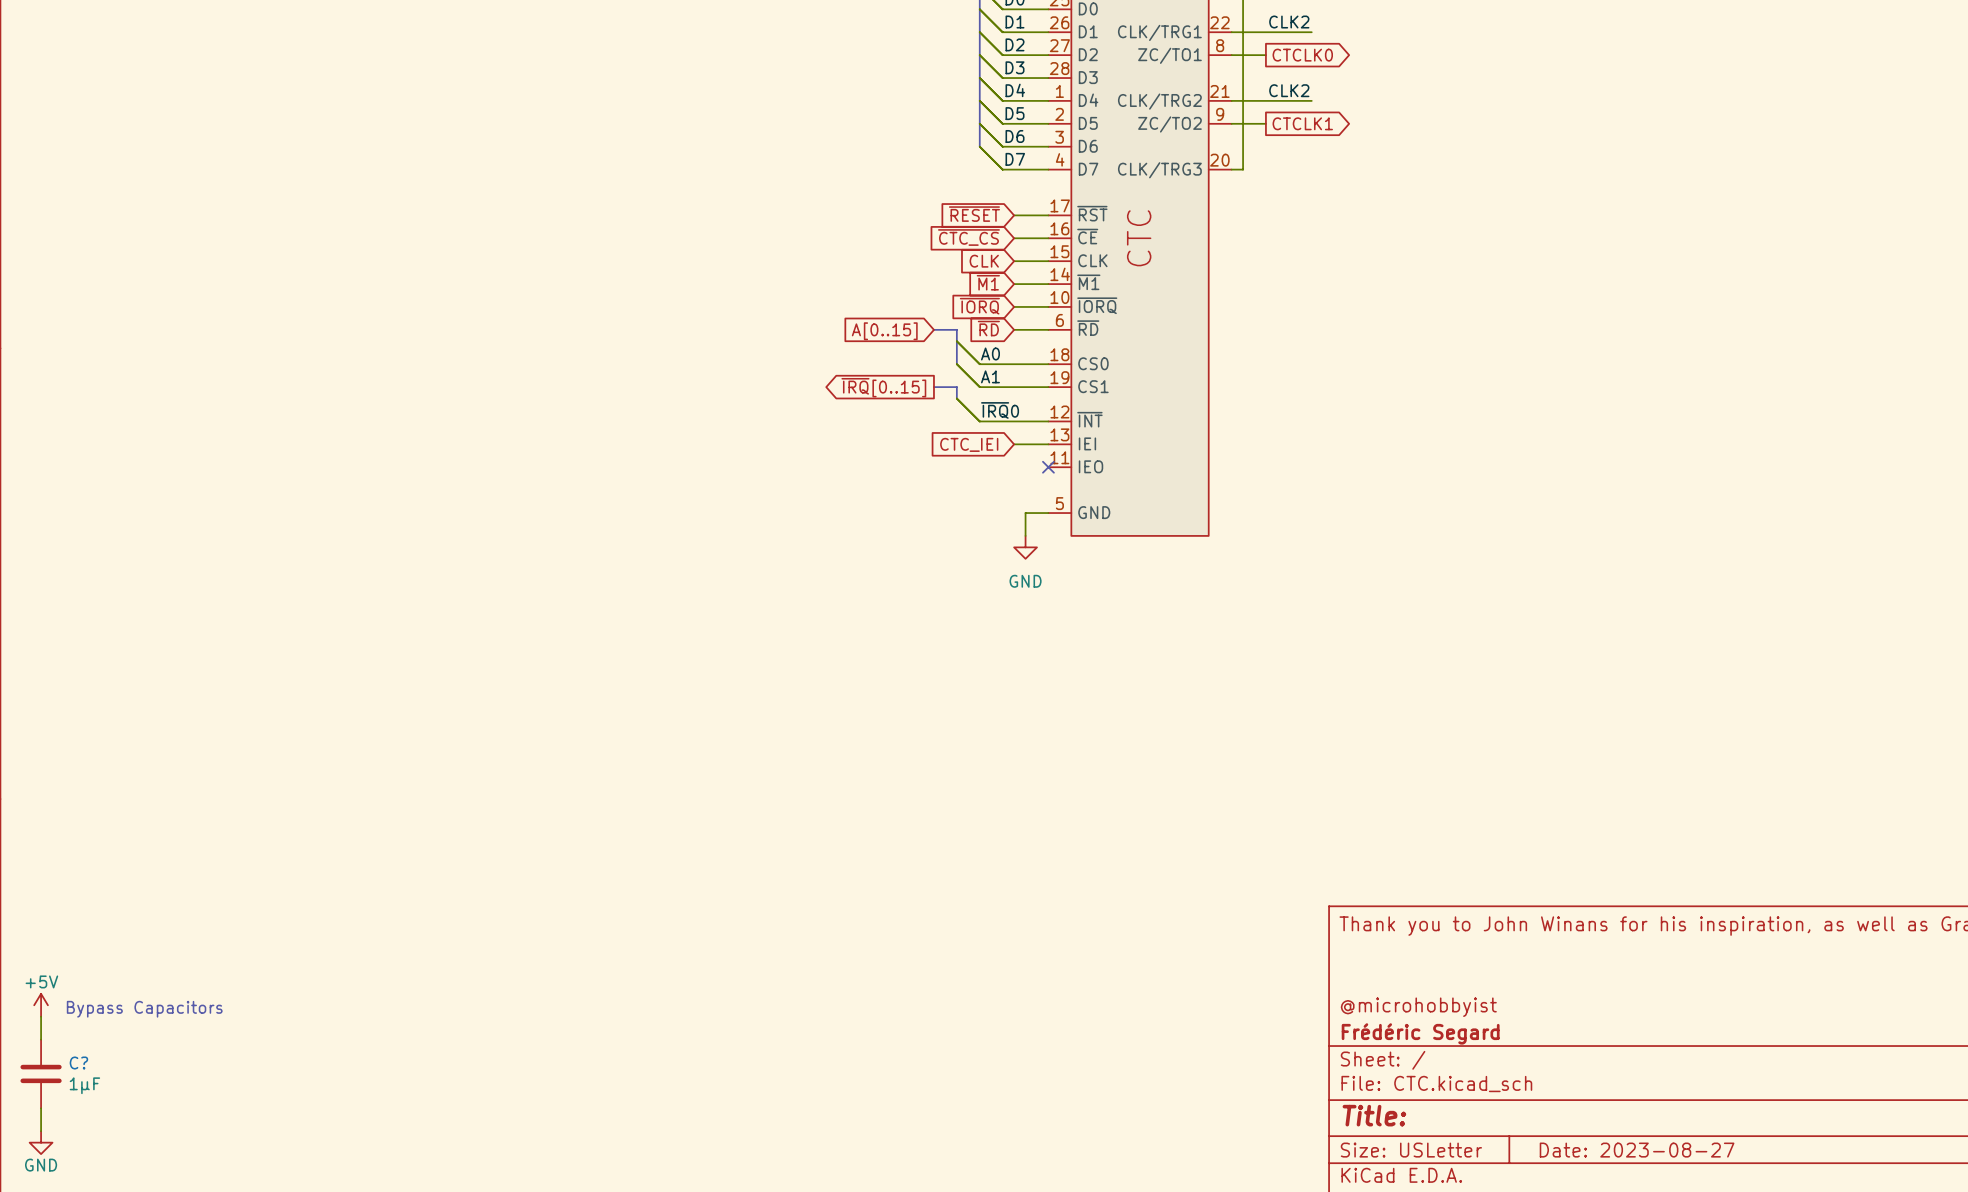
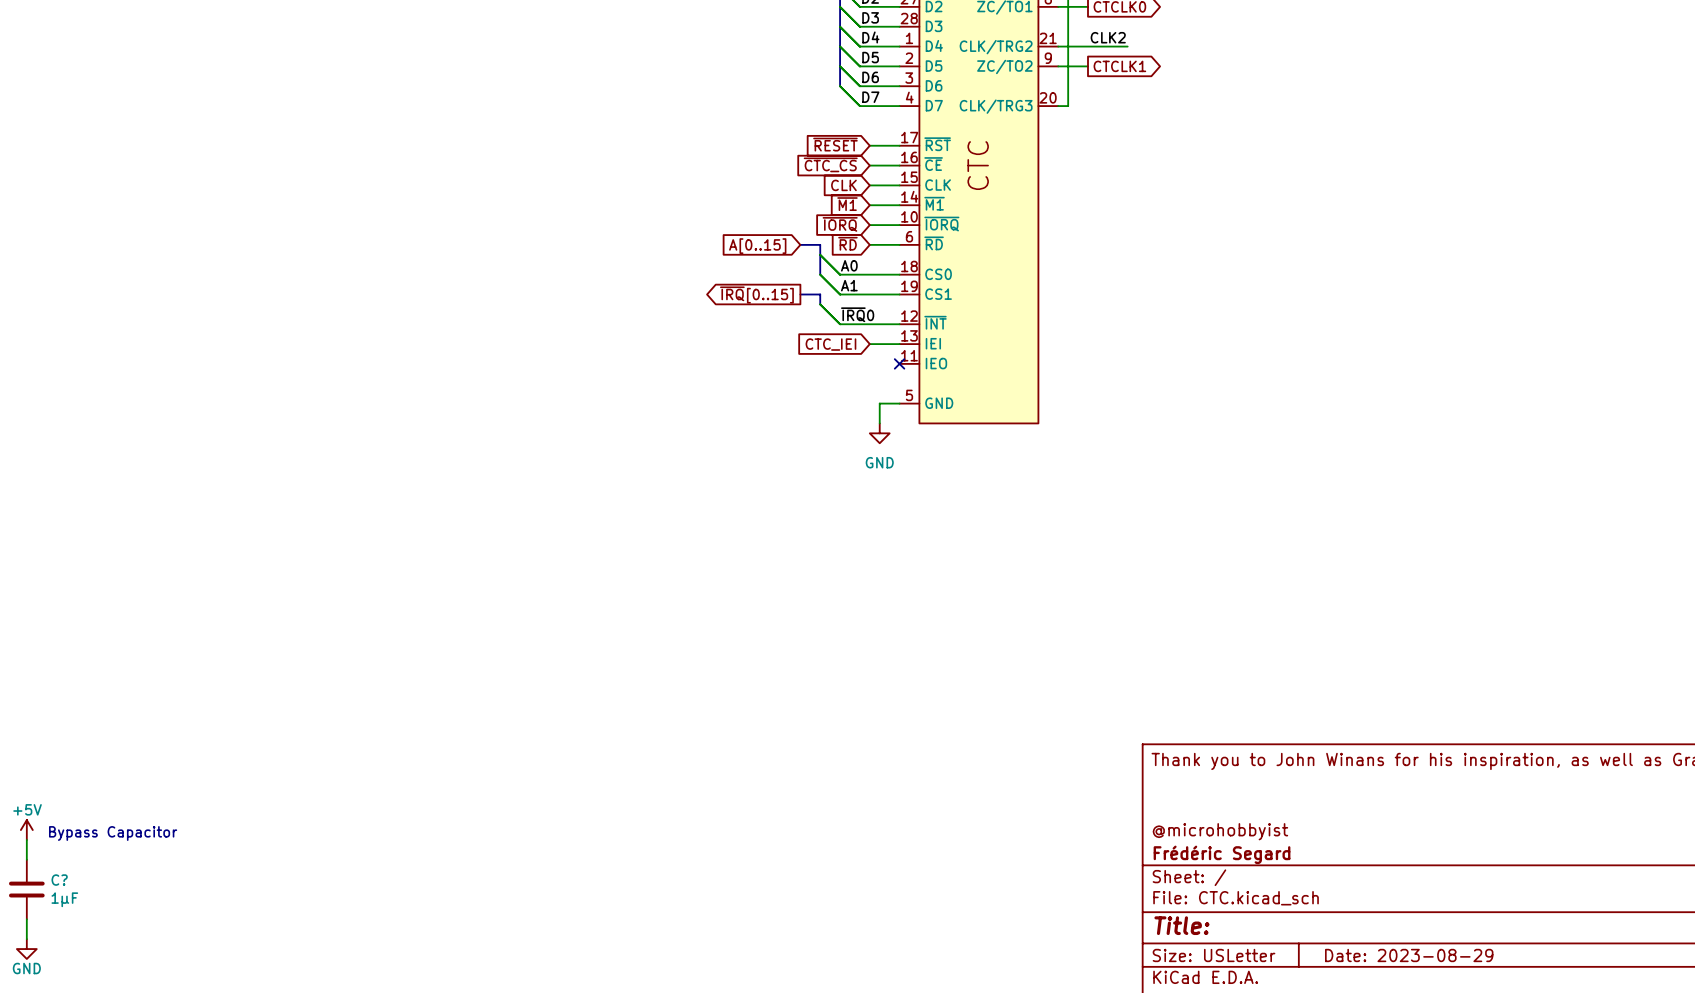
text: Bypass Capacitors (144, 1009) -> Bypass Capacitor (113, 833)
title block: Date: 2023-08-27 (1637, 1150) -> Date: 2023-08-29 (1409, 955)

